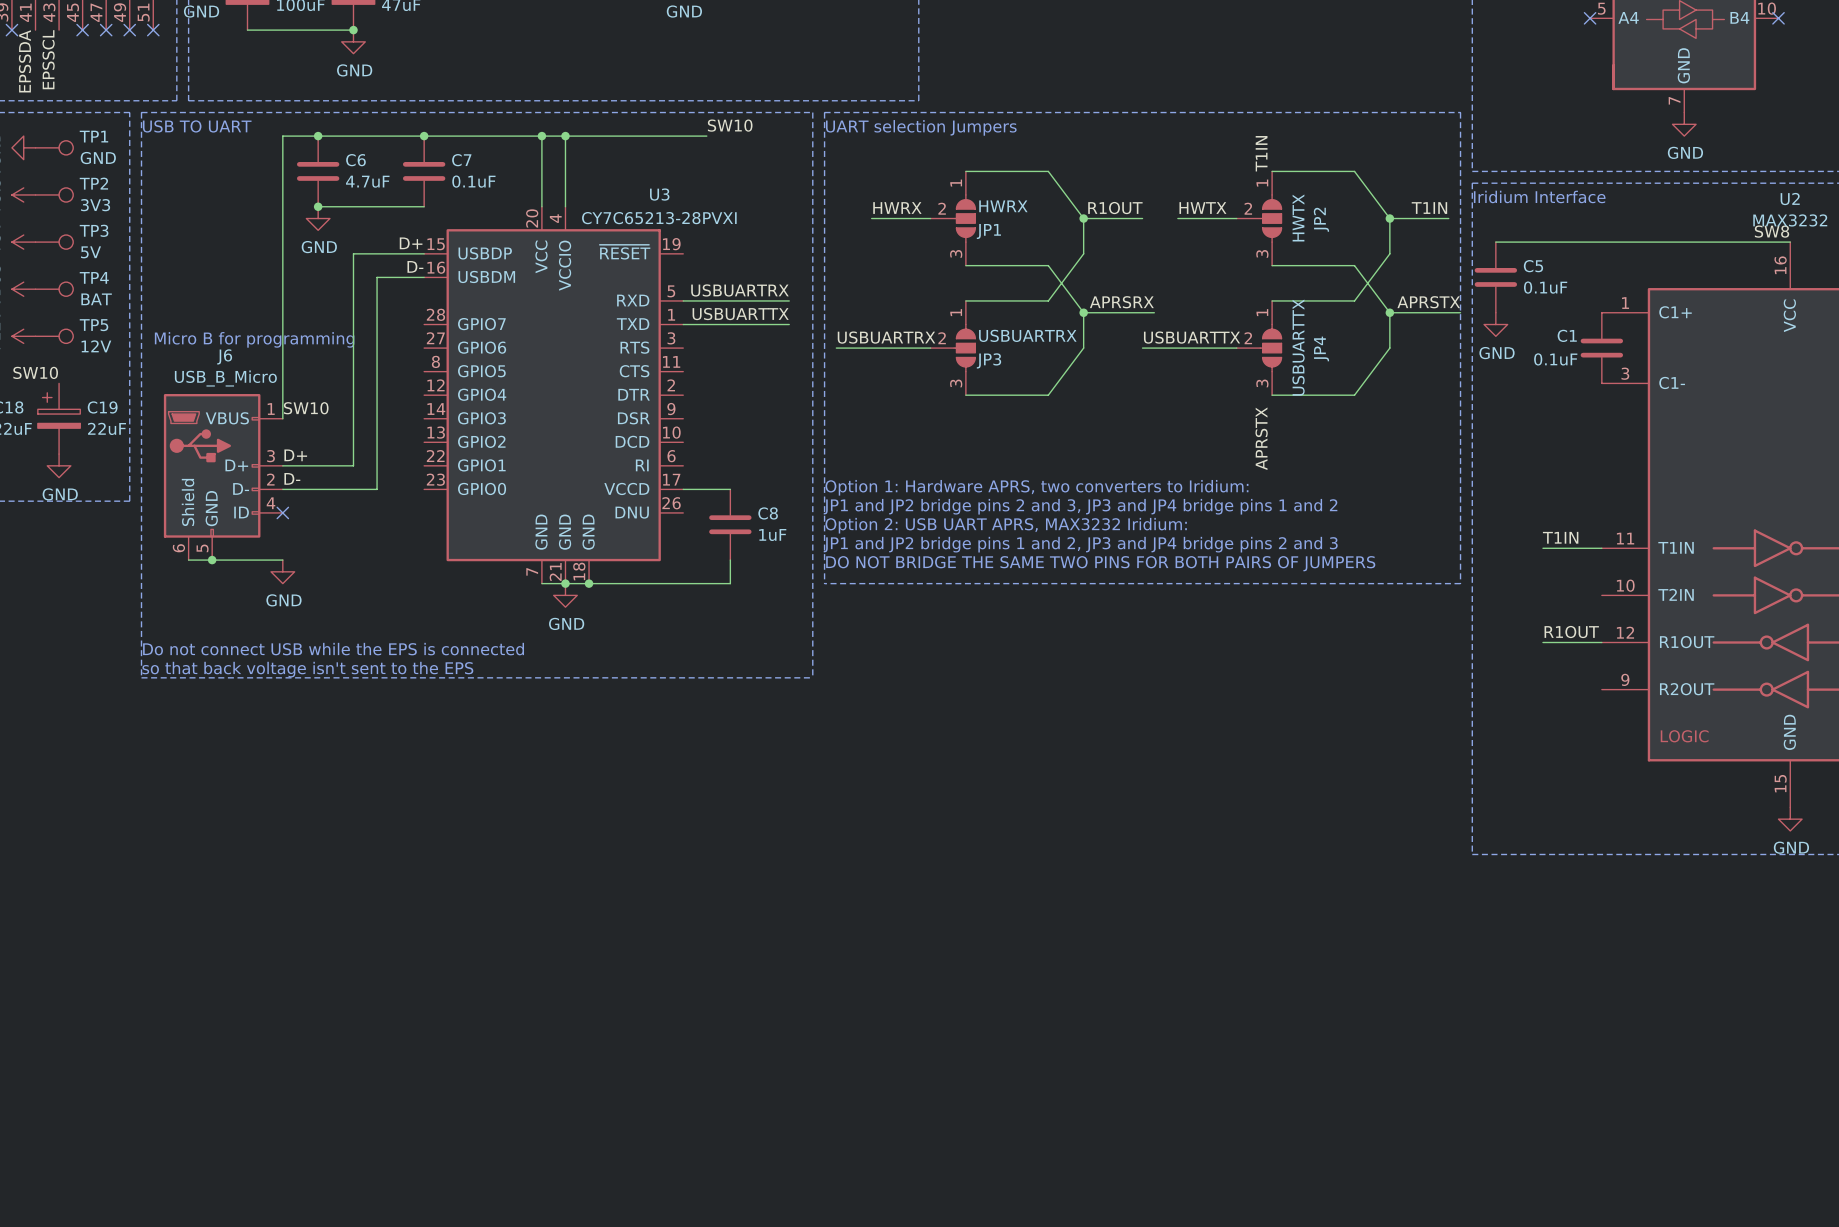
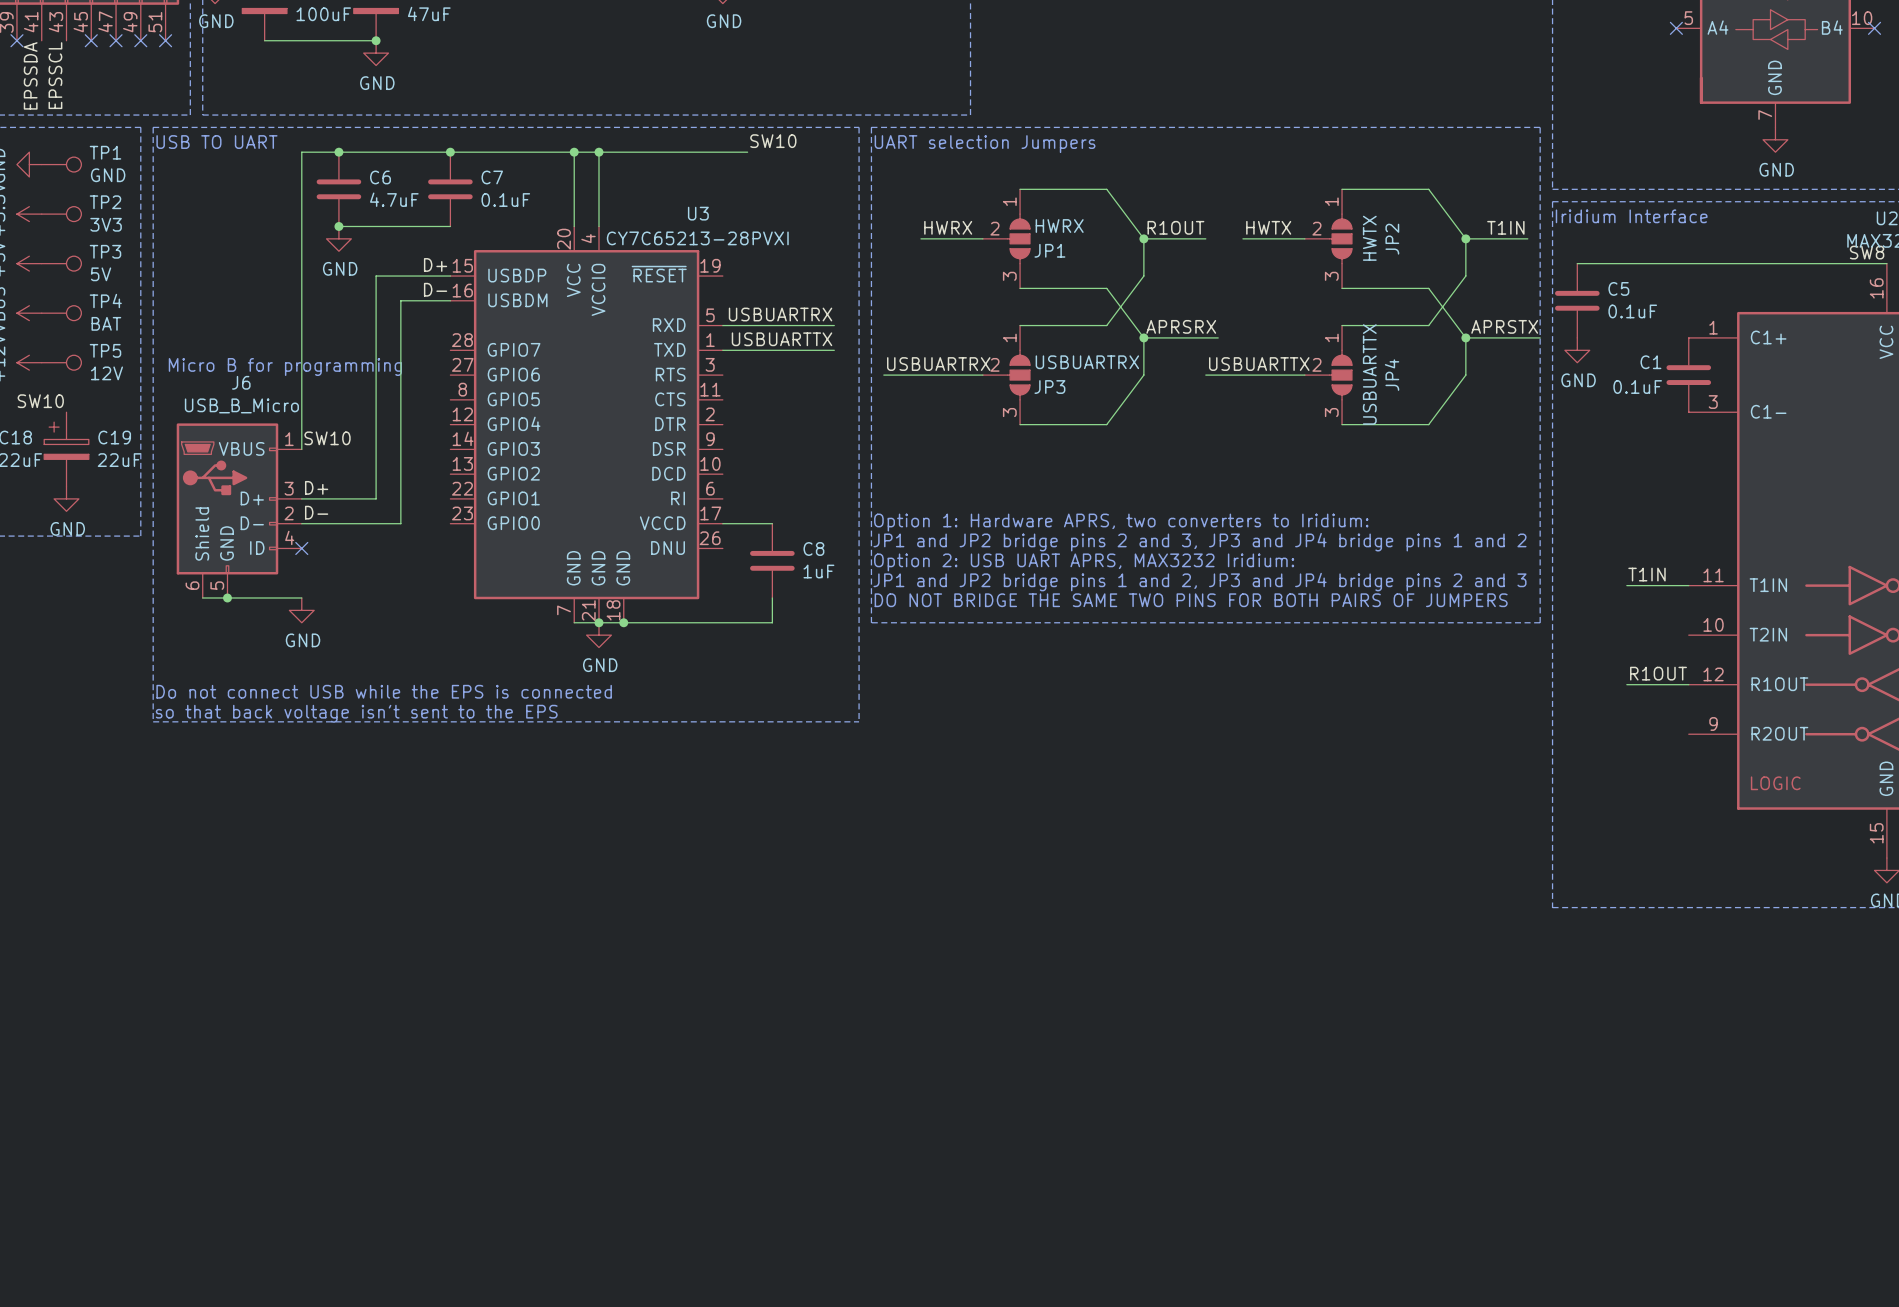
label: T1IN (1261, 153) -> none
label: APRSTX (1261, 438) -> none

